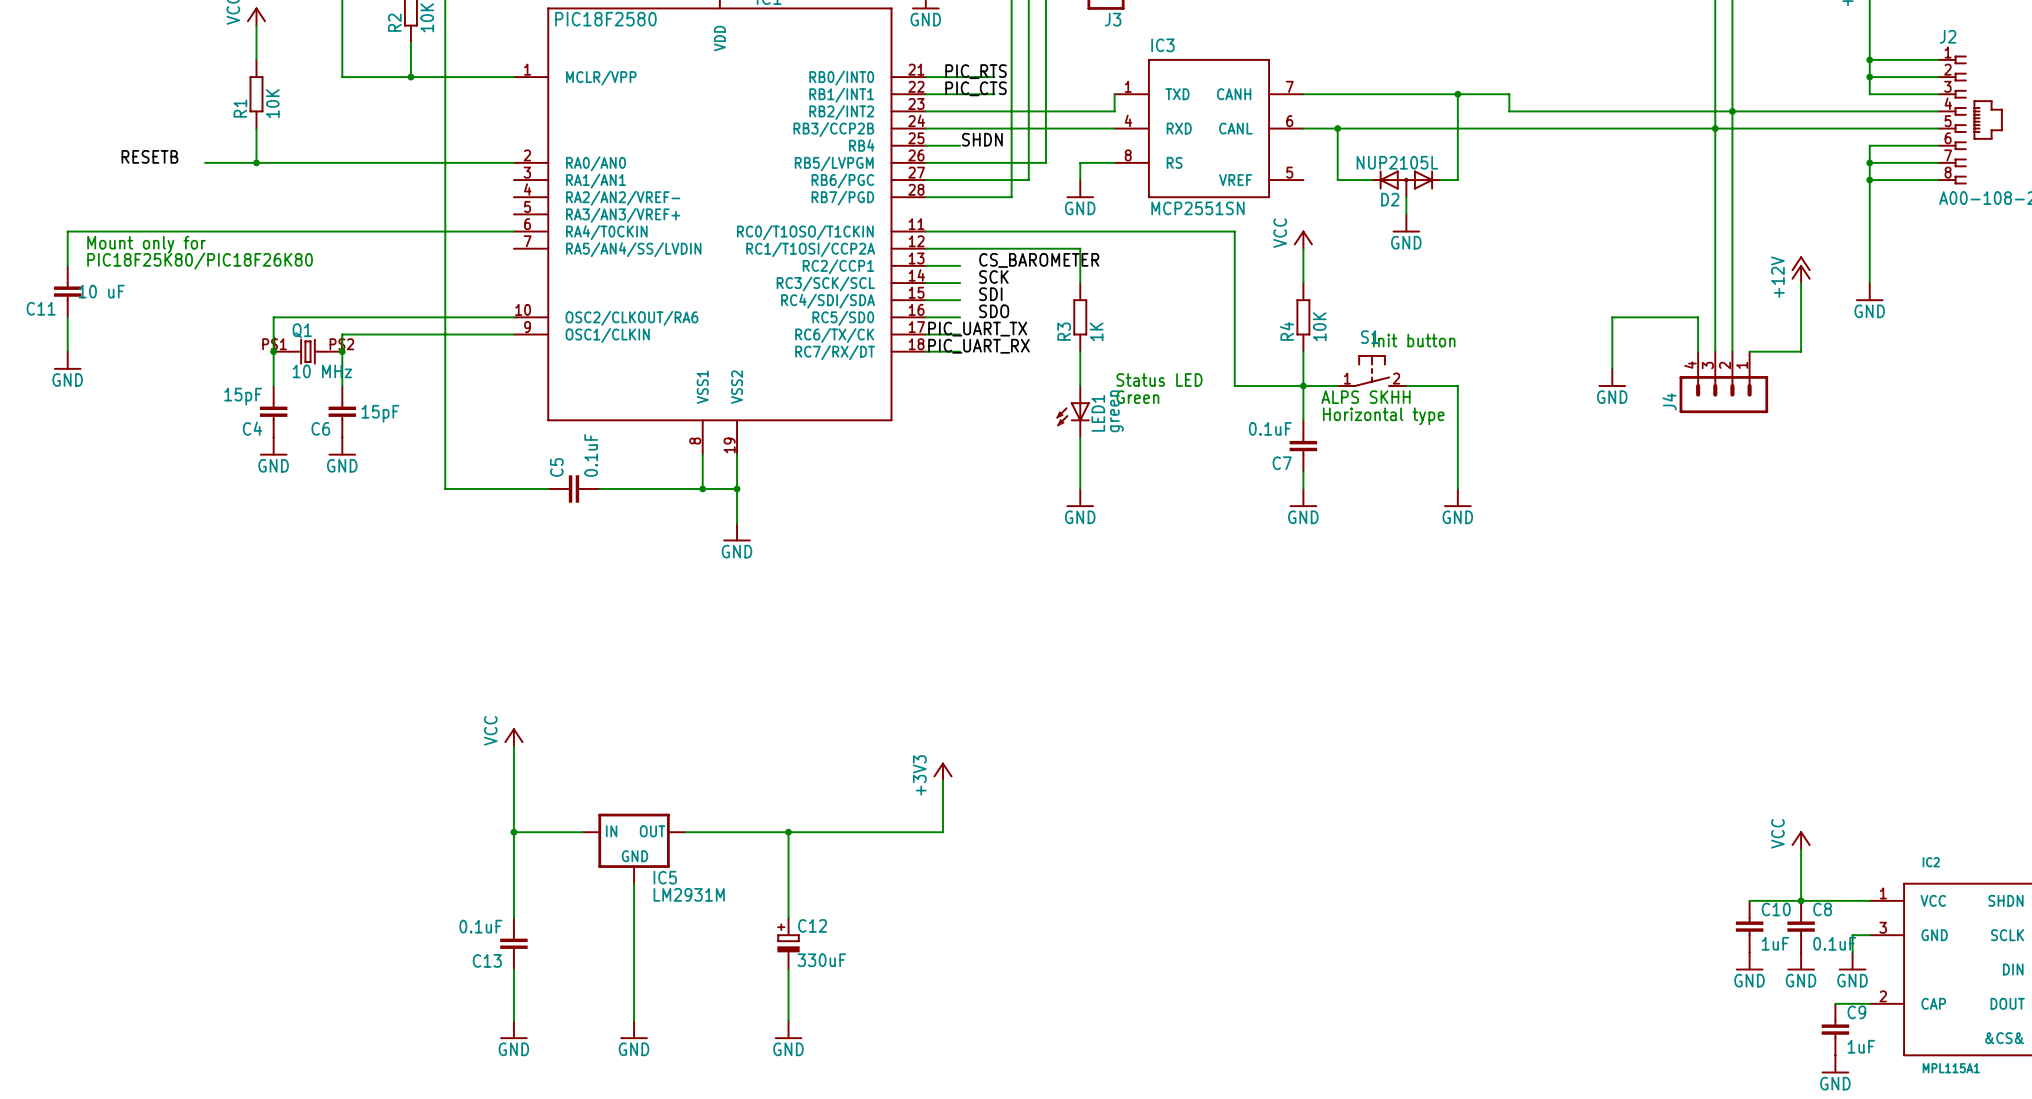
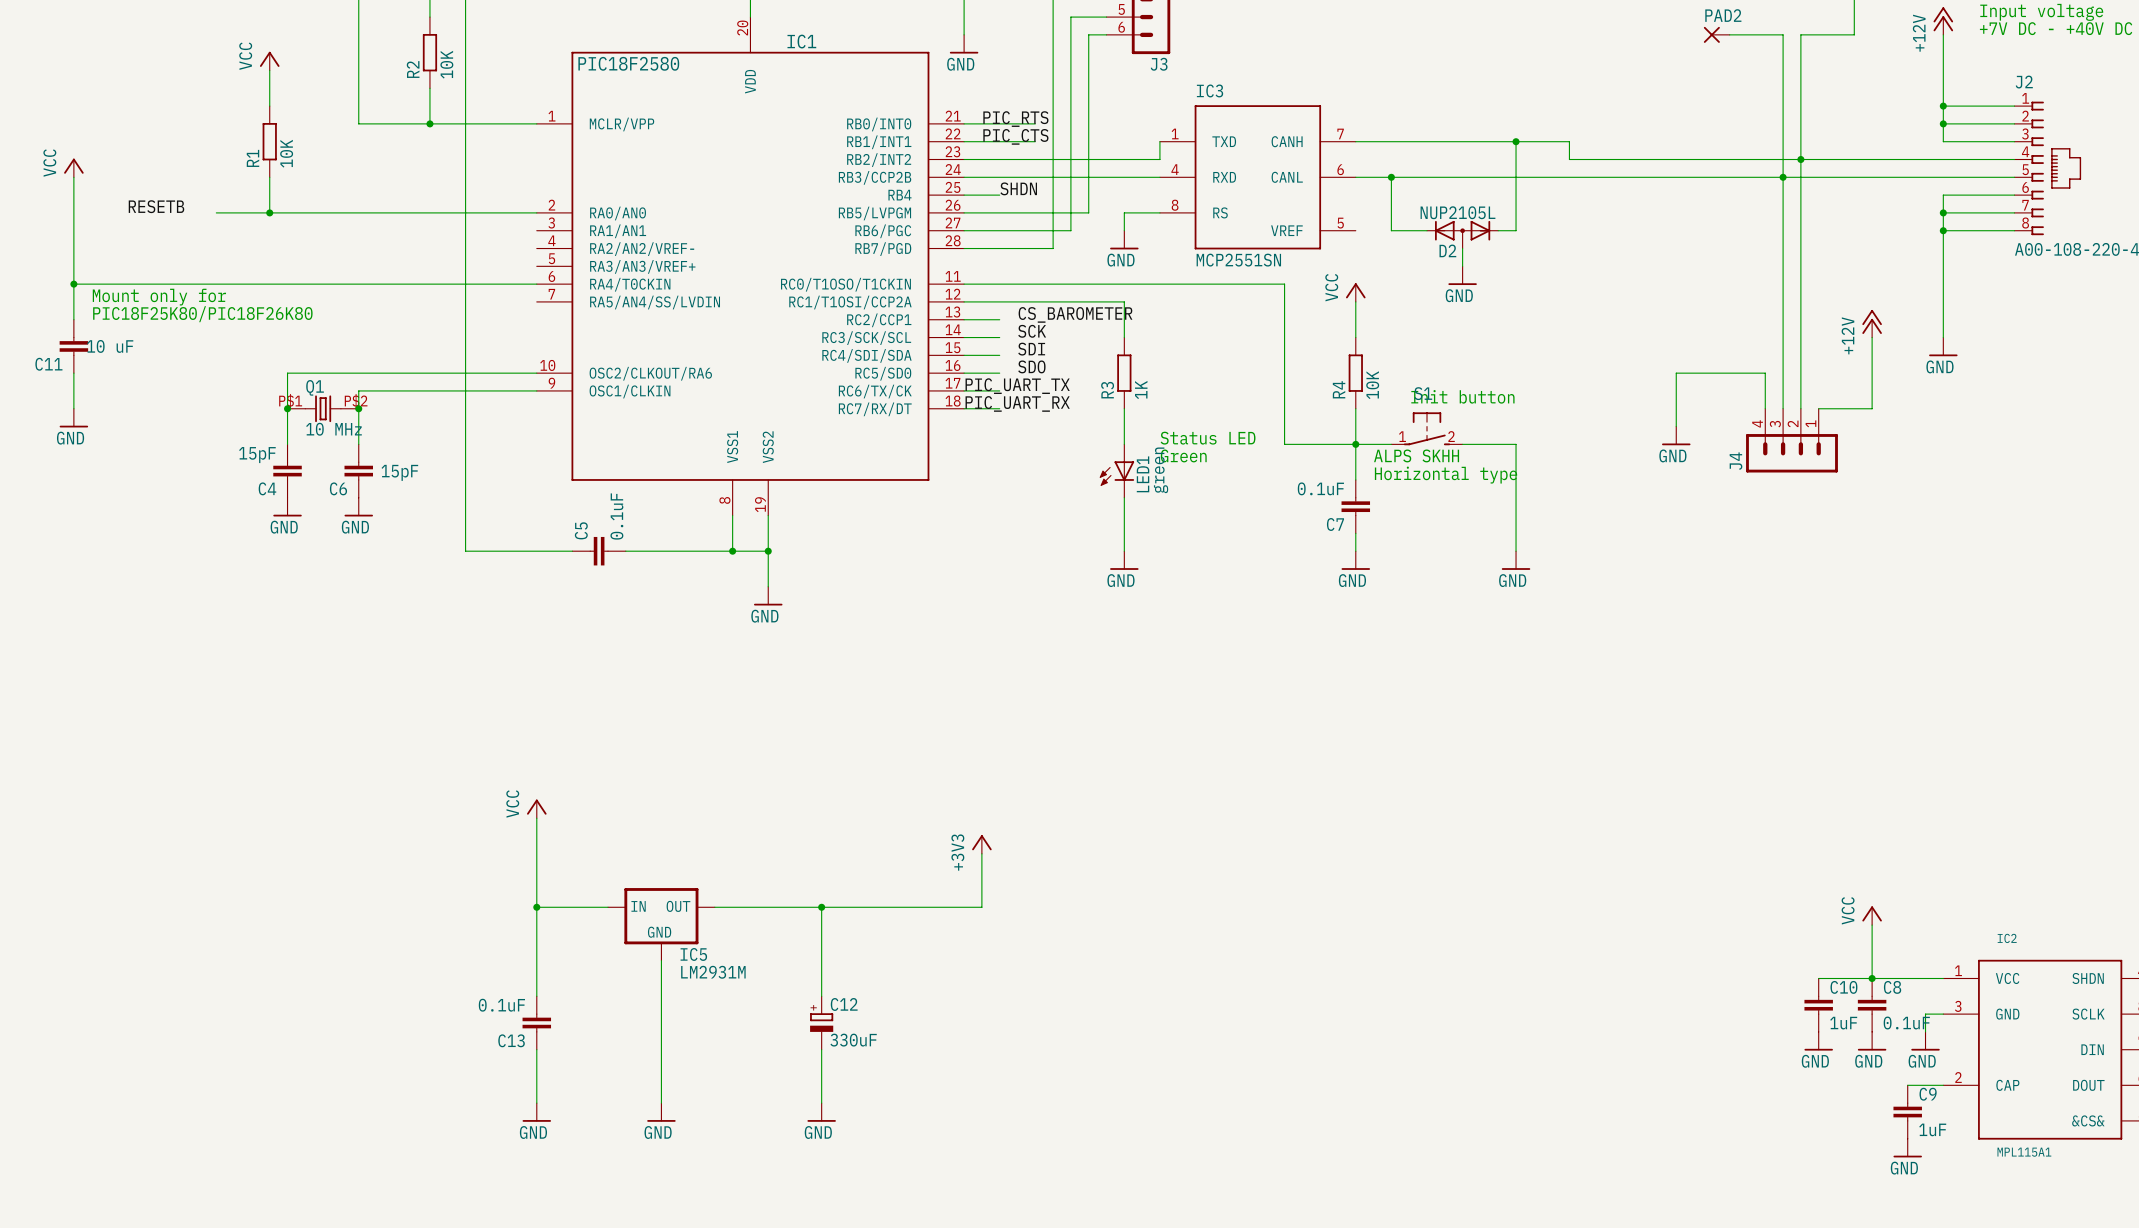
power symbol: none -> VCC (73, 167)
wire: none -> (73, 177) (73, 284)
junction: none -> (73, 284)

